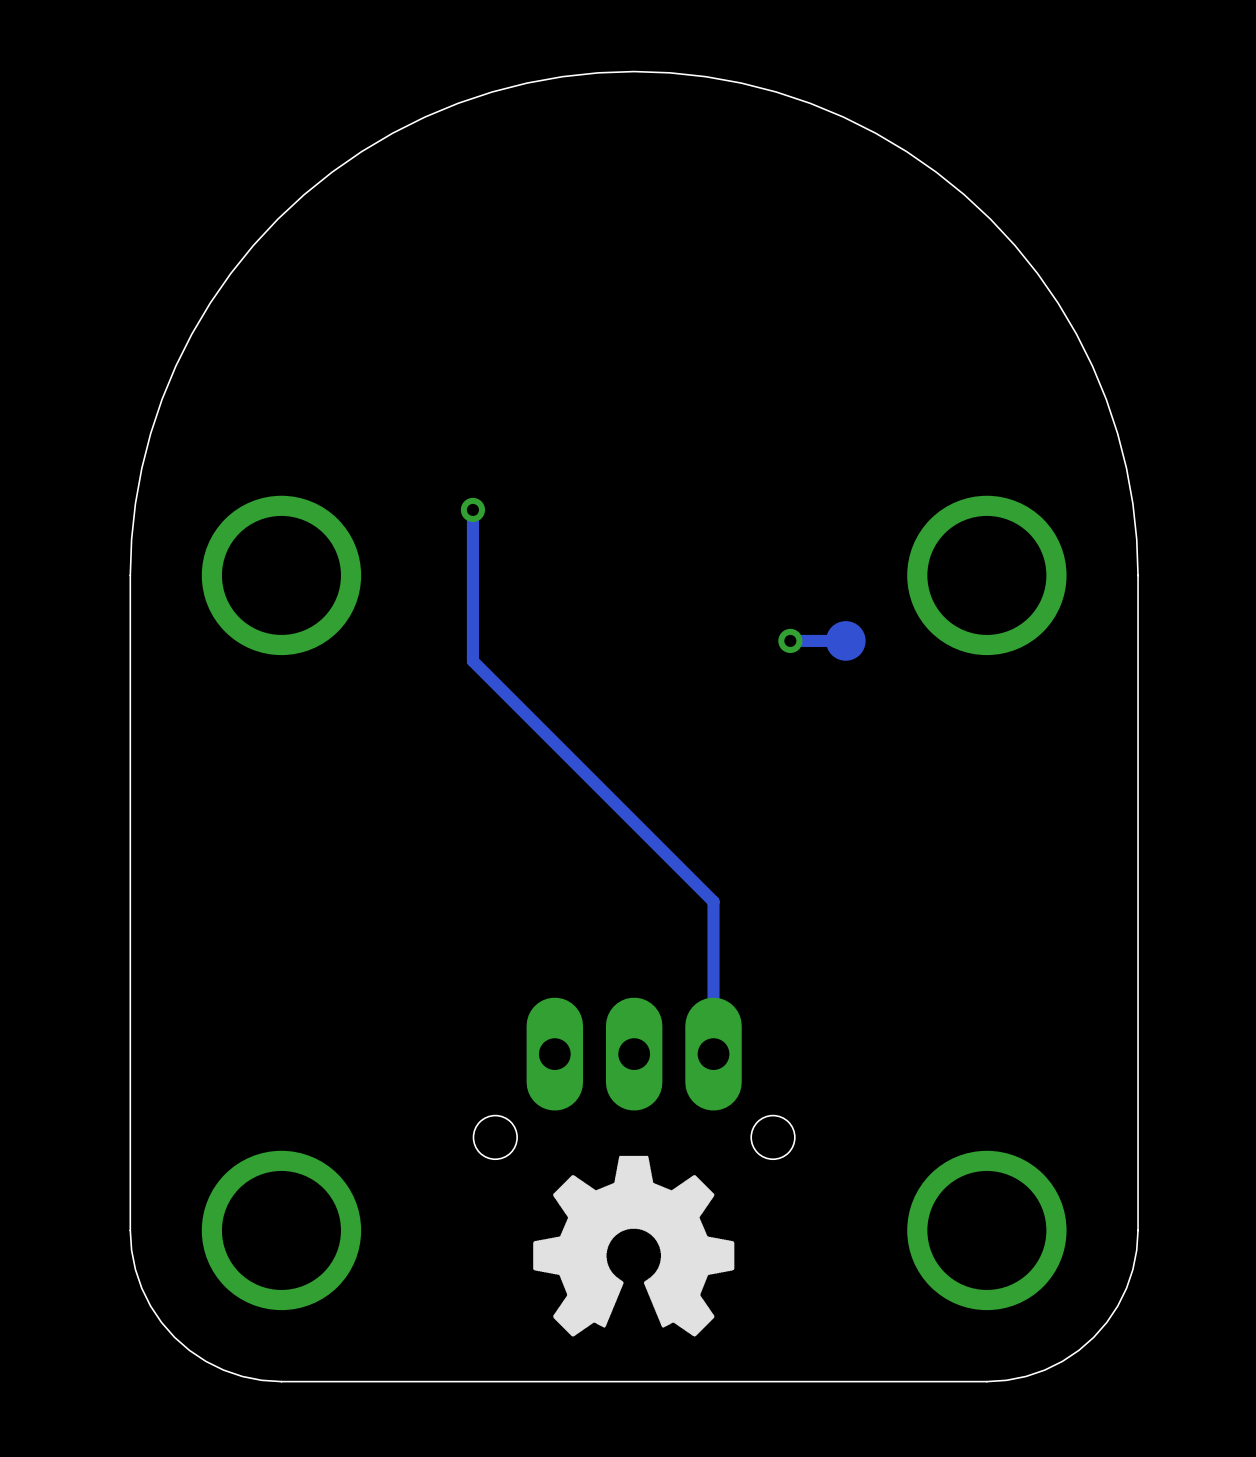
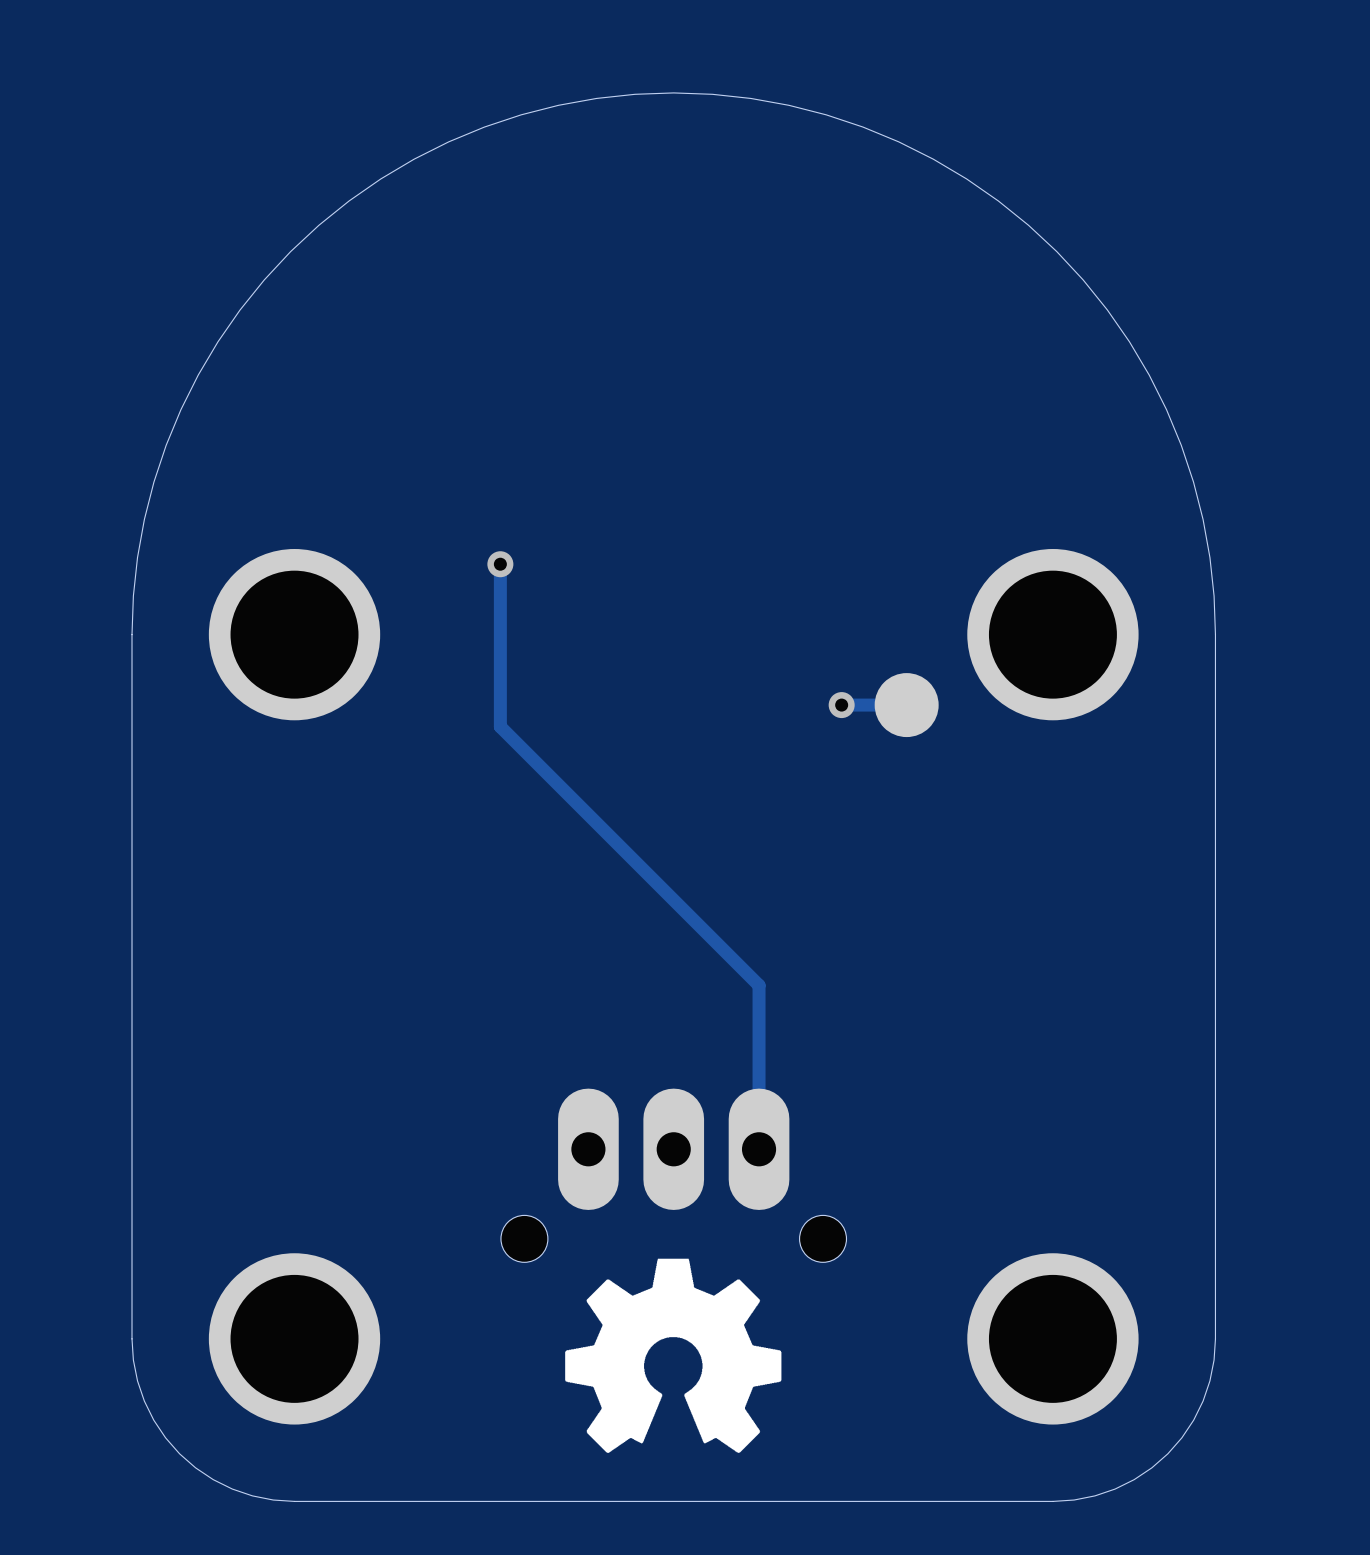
part footprint: [825, 621, 866, 661] -> [874, 673, 939, 738]

